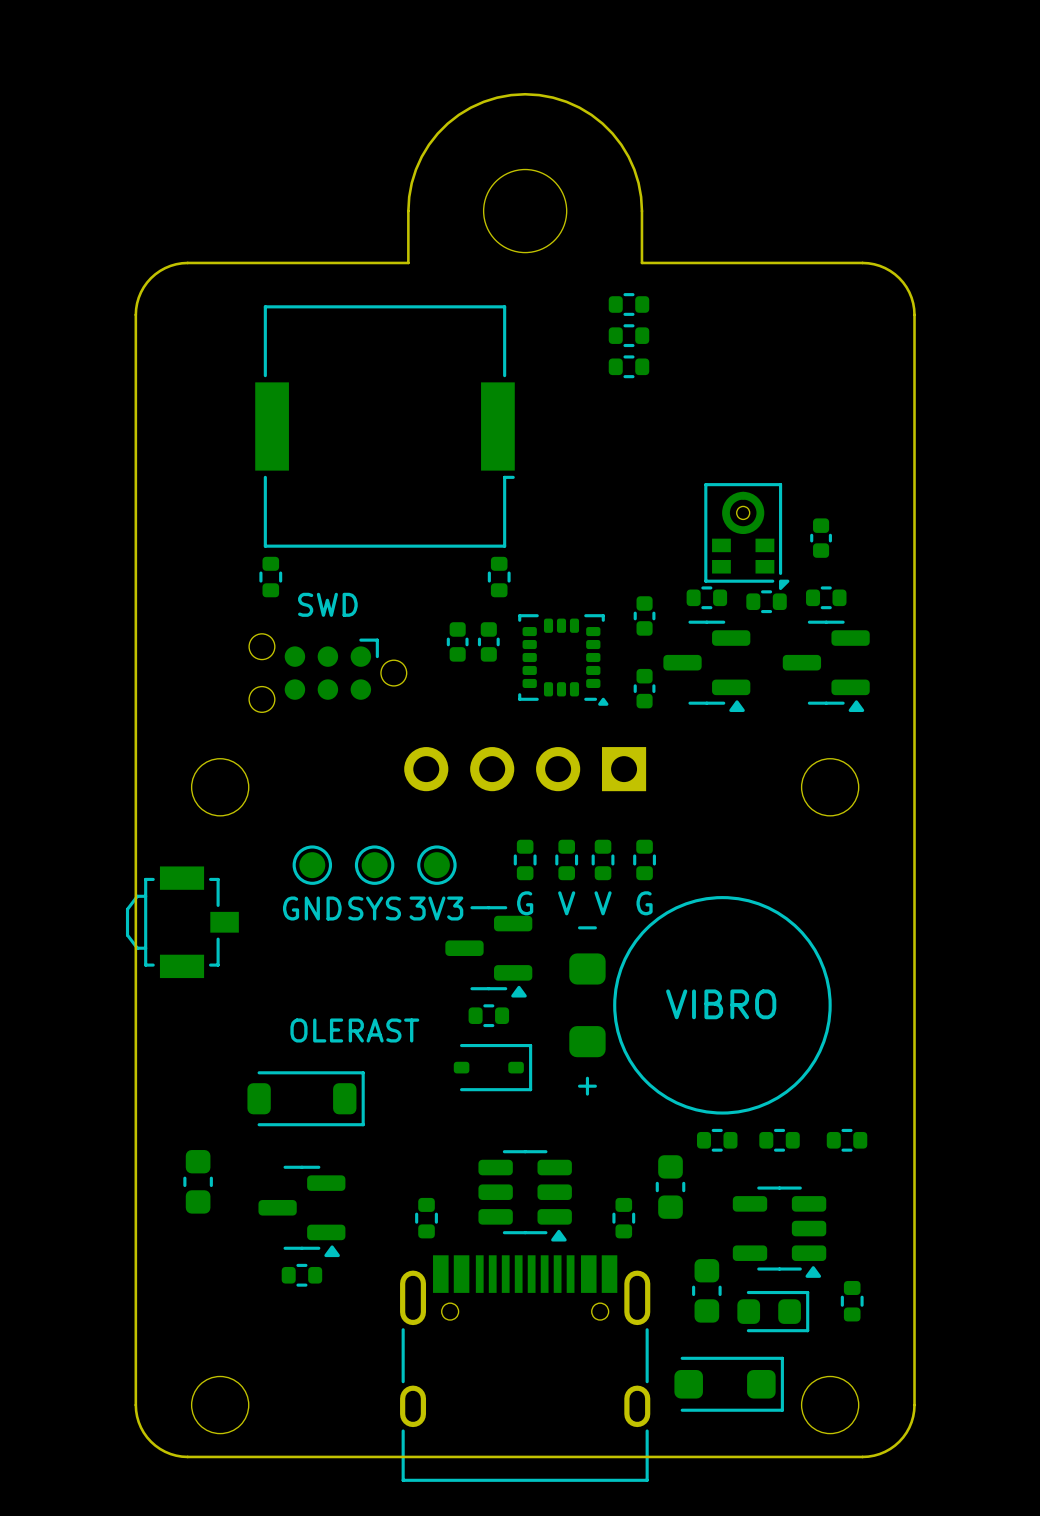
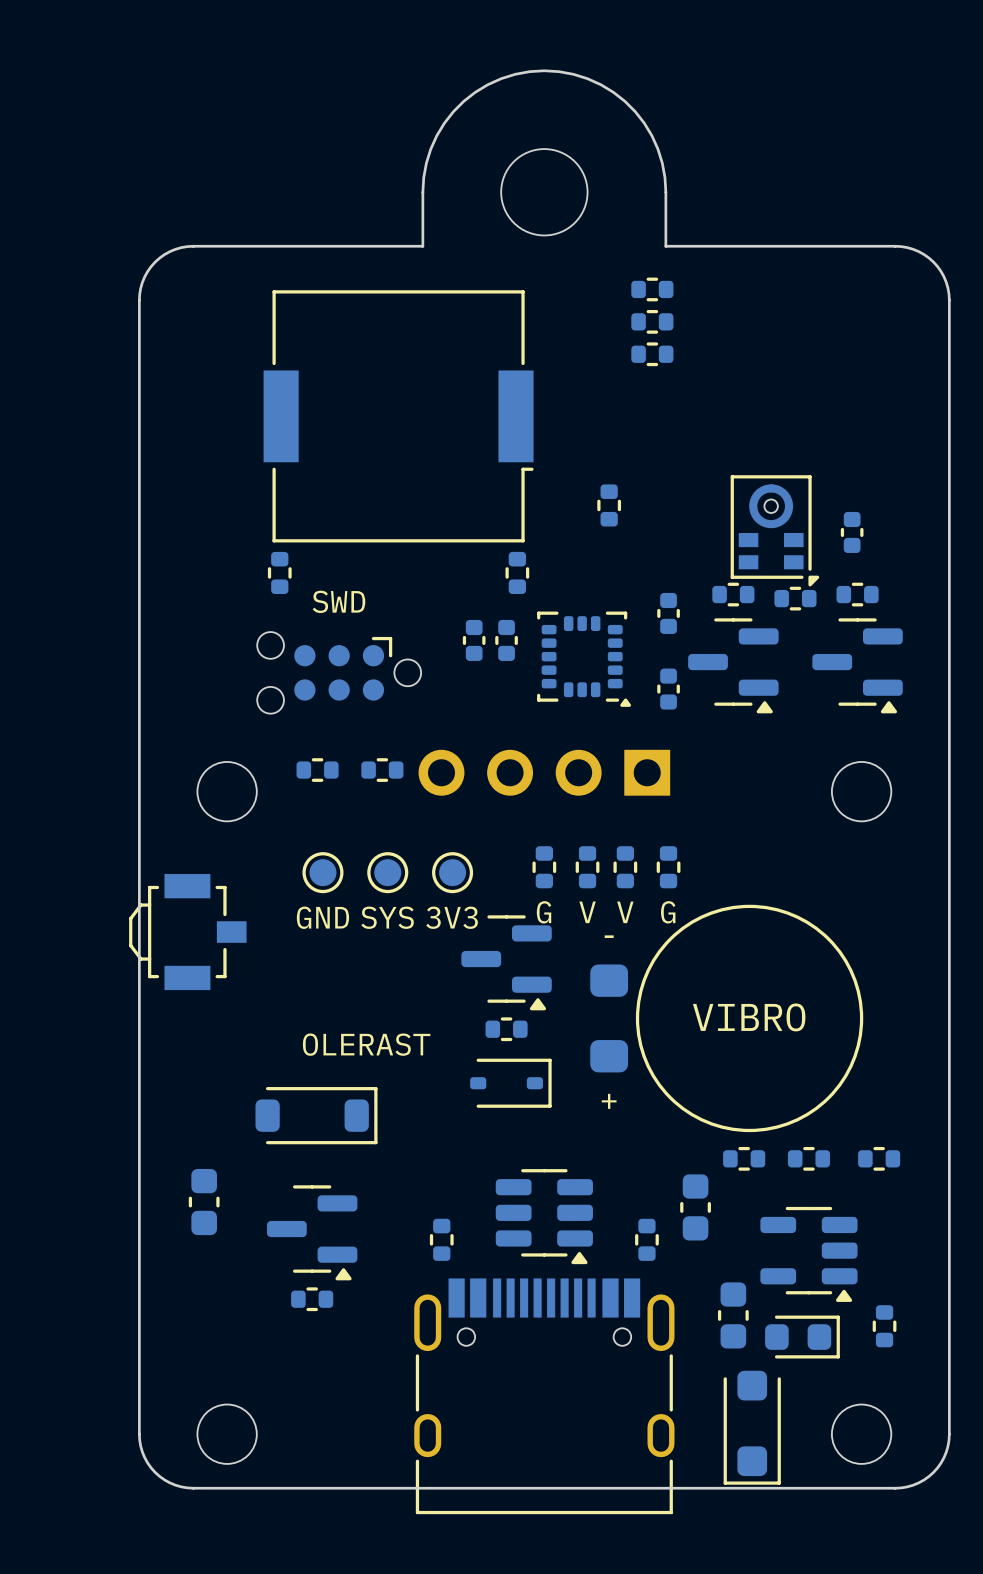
part: none -> (609, 505)
part: none -> (317, 770)
part: none -> (382, 770)
part rotation: 0° (729, 1384) -> 90° clockwise (752, 1427)

